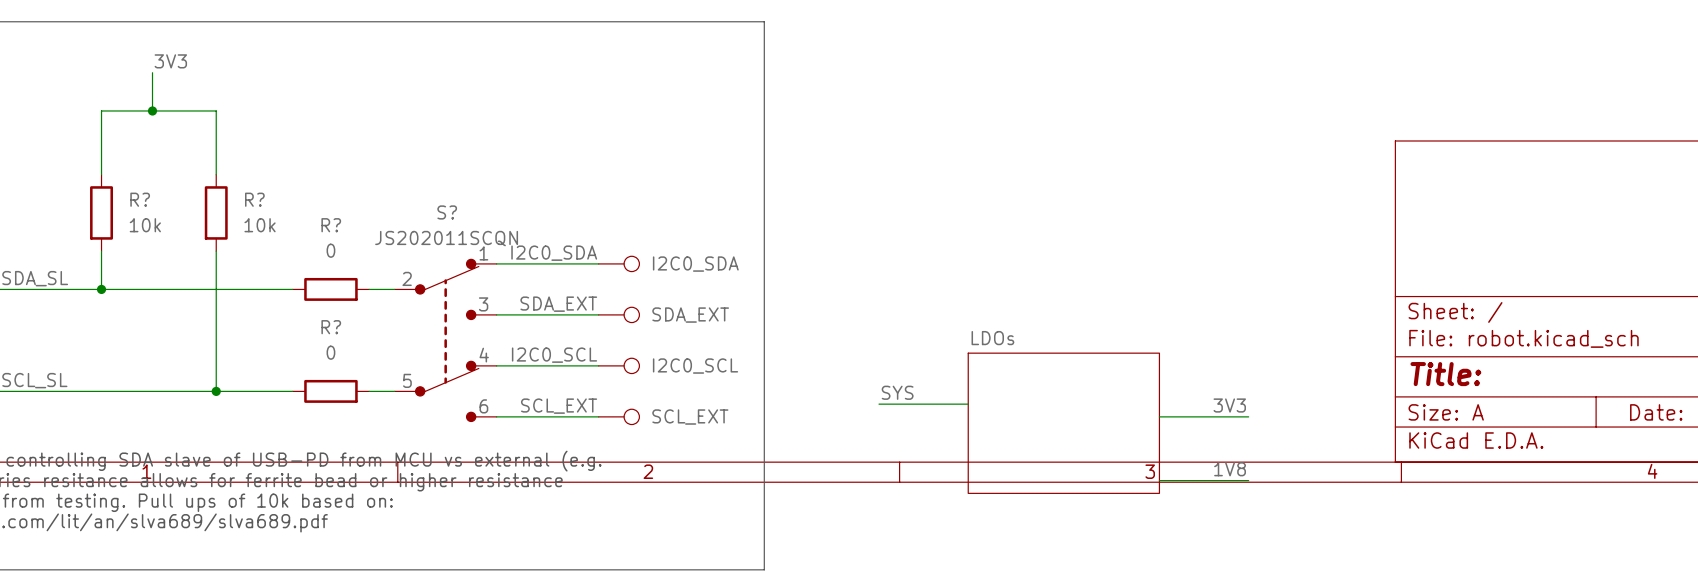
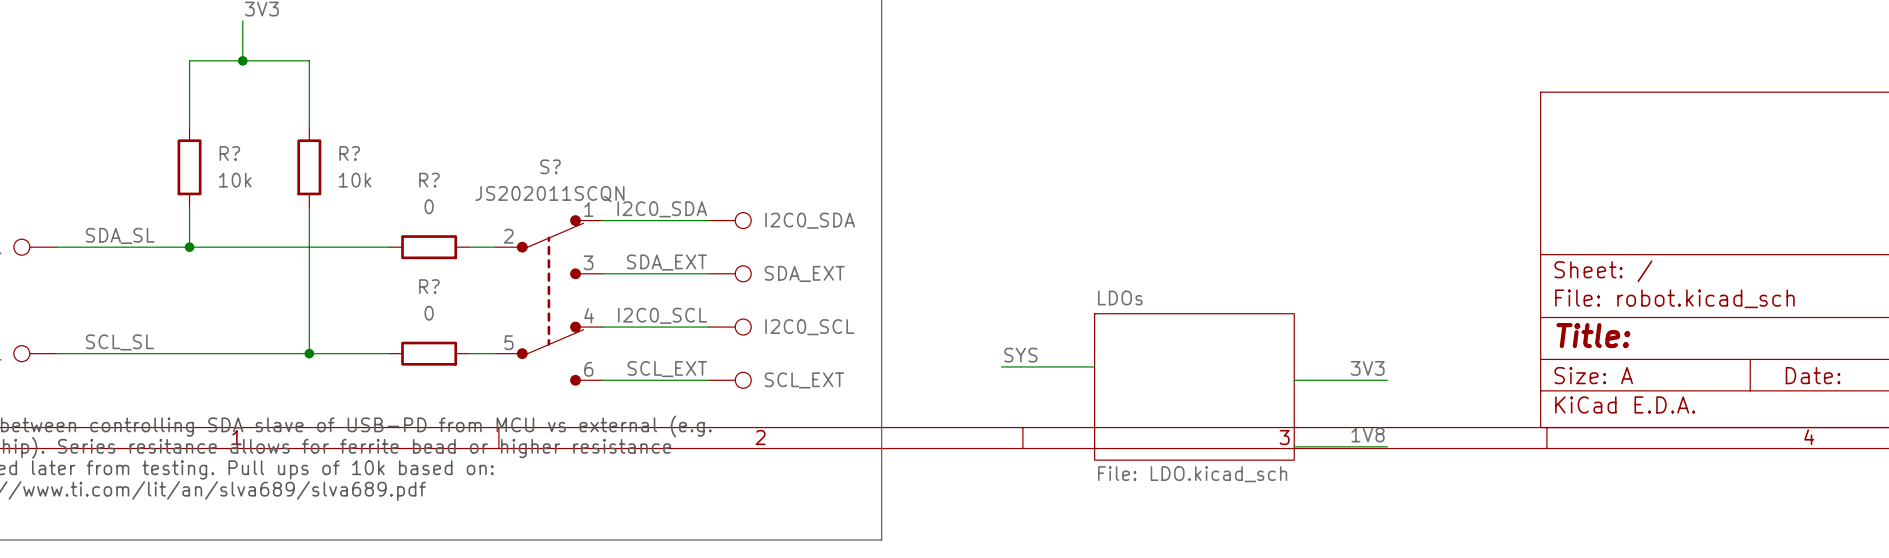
sheet LDOs value: none -> File: LDO.kicad_sch (1192, 474)

